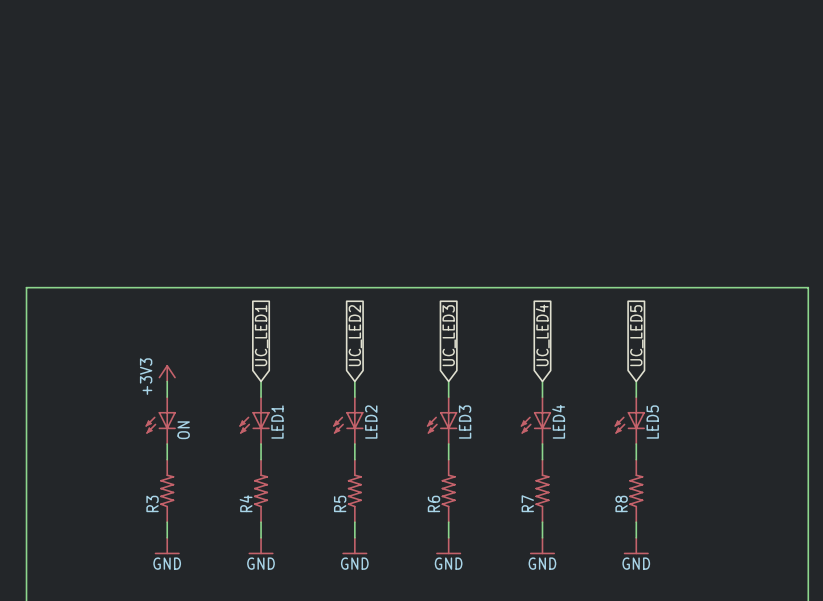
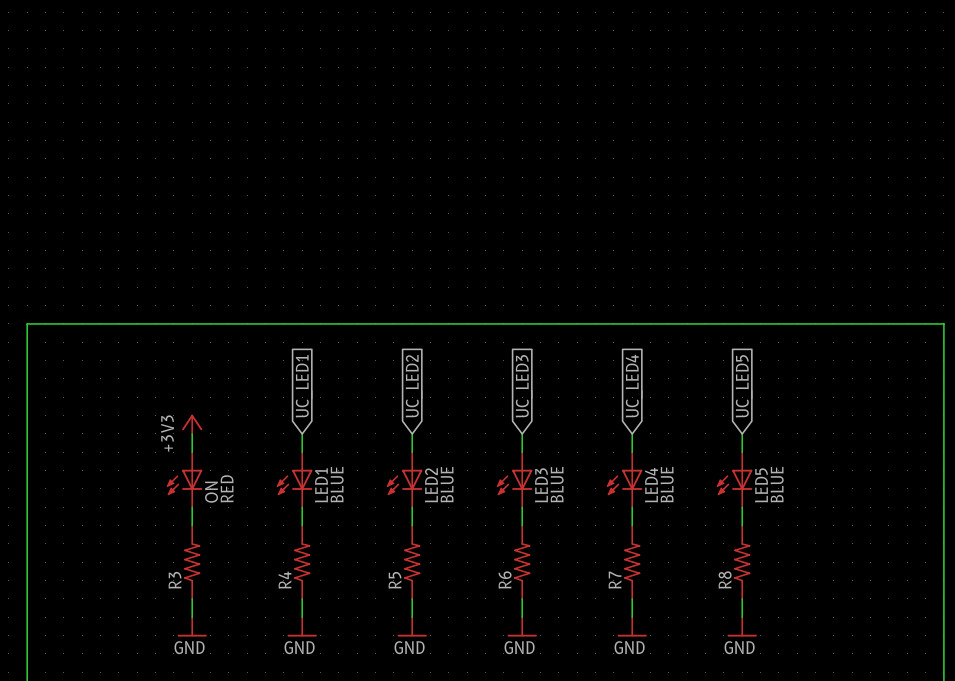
LED1 value: none -> BLUE (337, 484)
LED2 value: none -> BLUE (447, 484)
LED3 value: none -> BLUE (557, 484)
LED4 value: none -> BLUE (667, 484)
LED5 value: none -> BLUE (777, 484)
ON value: none -> RED (227, 488)

